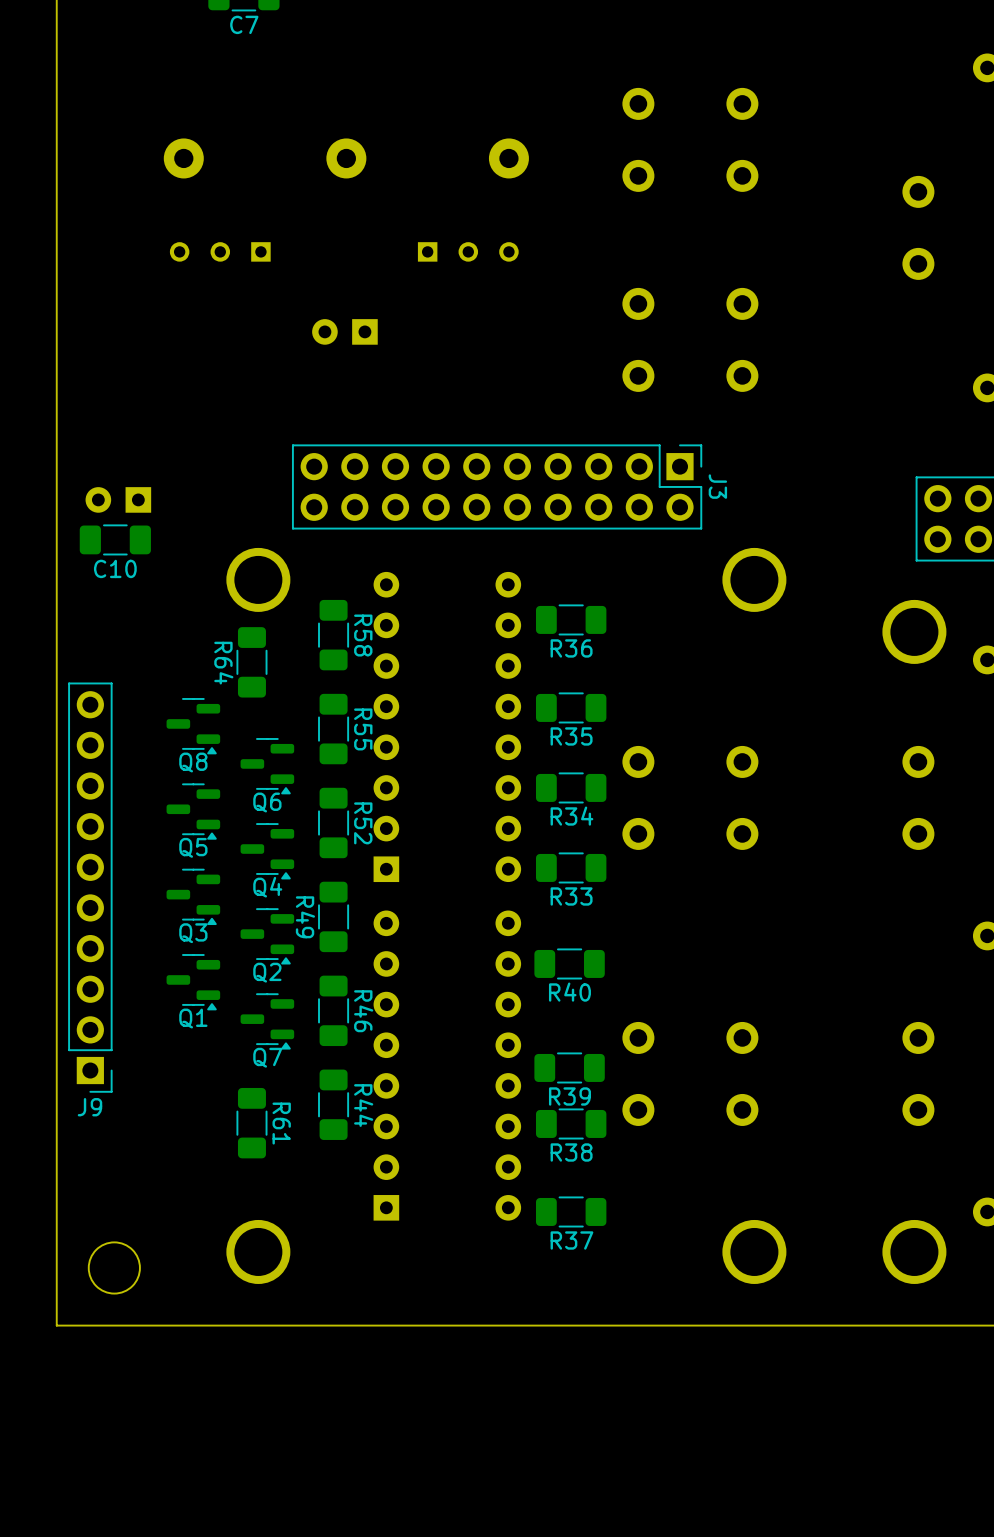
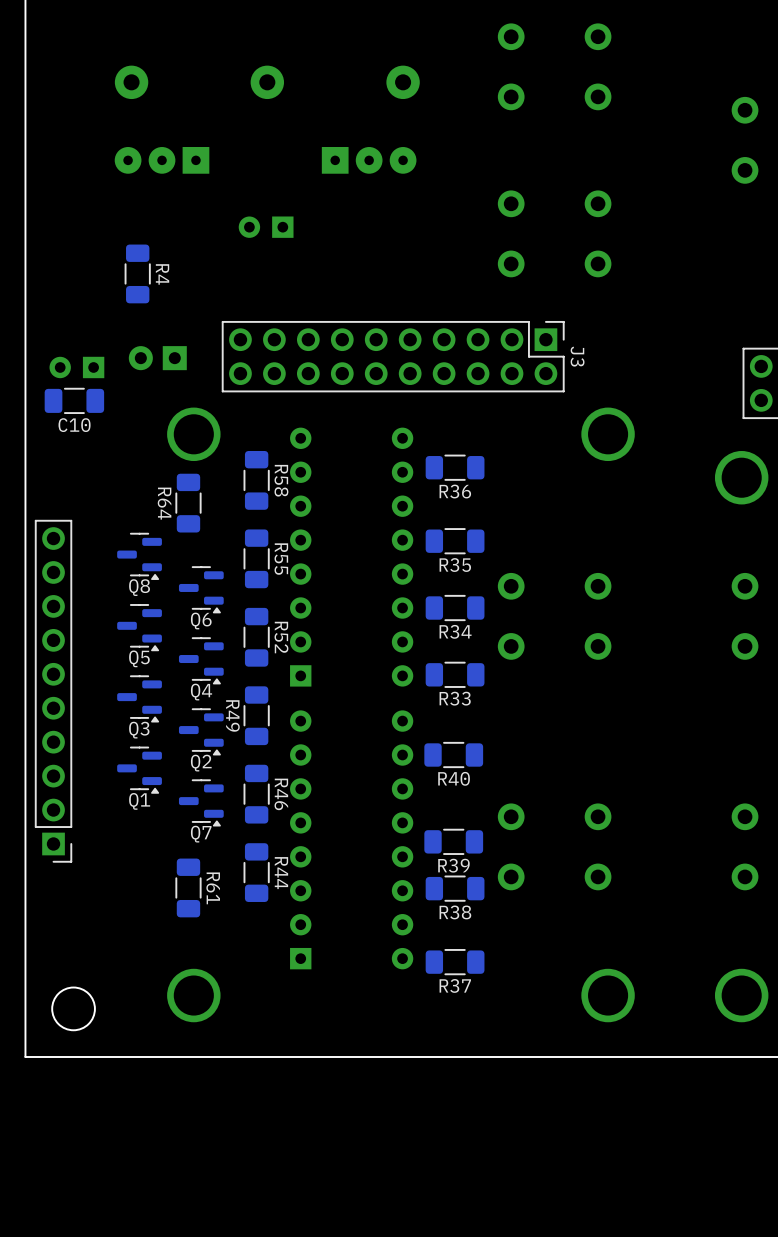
part footprint: [169, 242, 271, 262] -> [114, 147, 210, 174]
part footprint: [417, 242, 519, 262] -> [321, 147, 417, 174]
R4: none -> (137, 273)
part: none -> (157, 358)
J9 name: J9 (89, 1107) -> none

